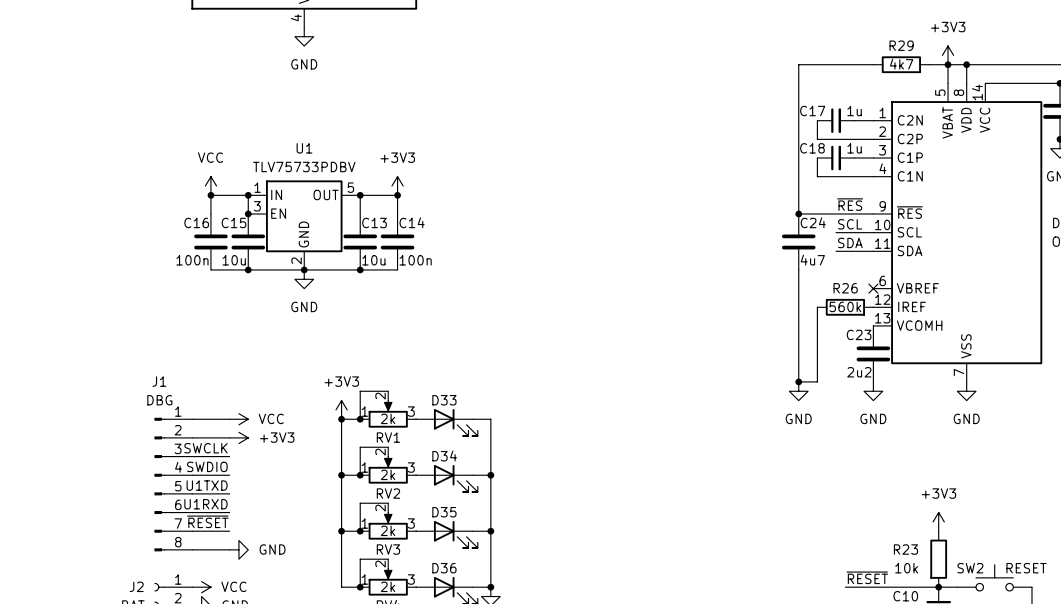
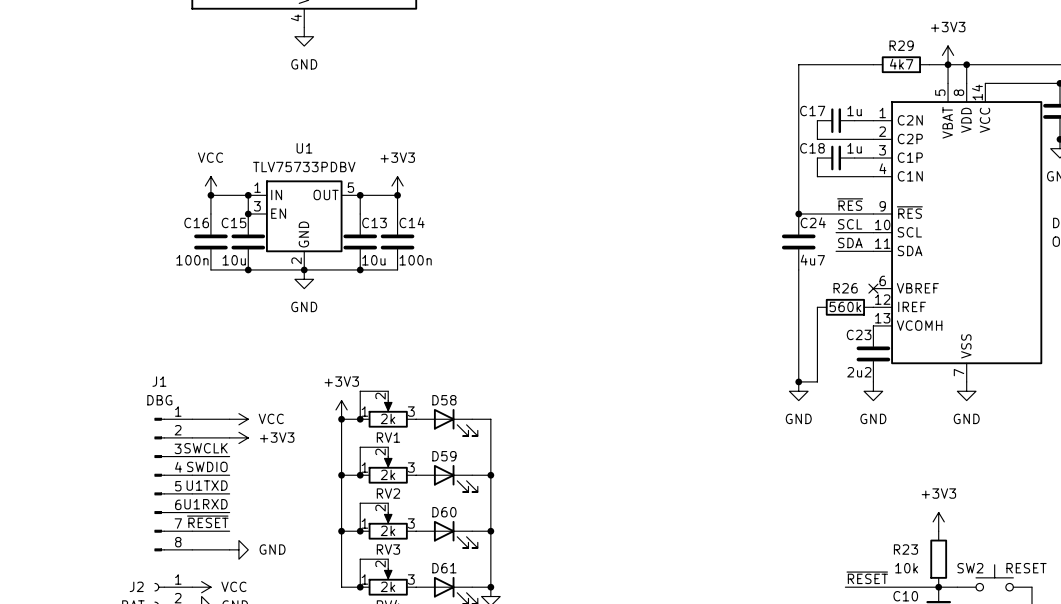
D33 name: D33 (444, 400) -> D58 (444, 400)
D34 name: D34 (444, 456) -> D59 (444, 456)
D35 name: D35 (444, 512) -> D60 (444, 512)
D36 name: D36 (444, 568) -> D61 (444, 568)

